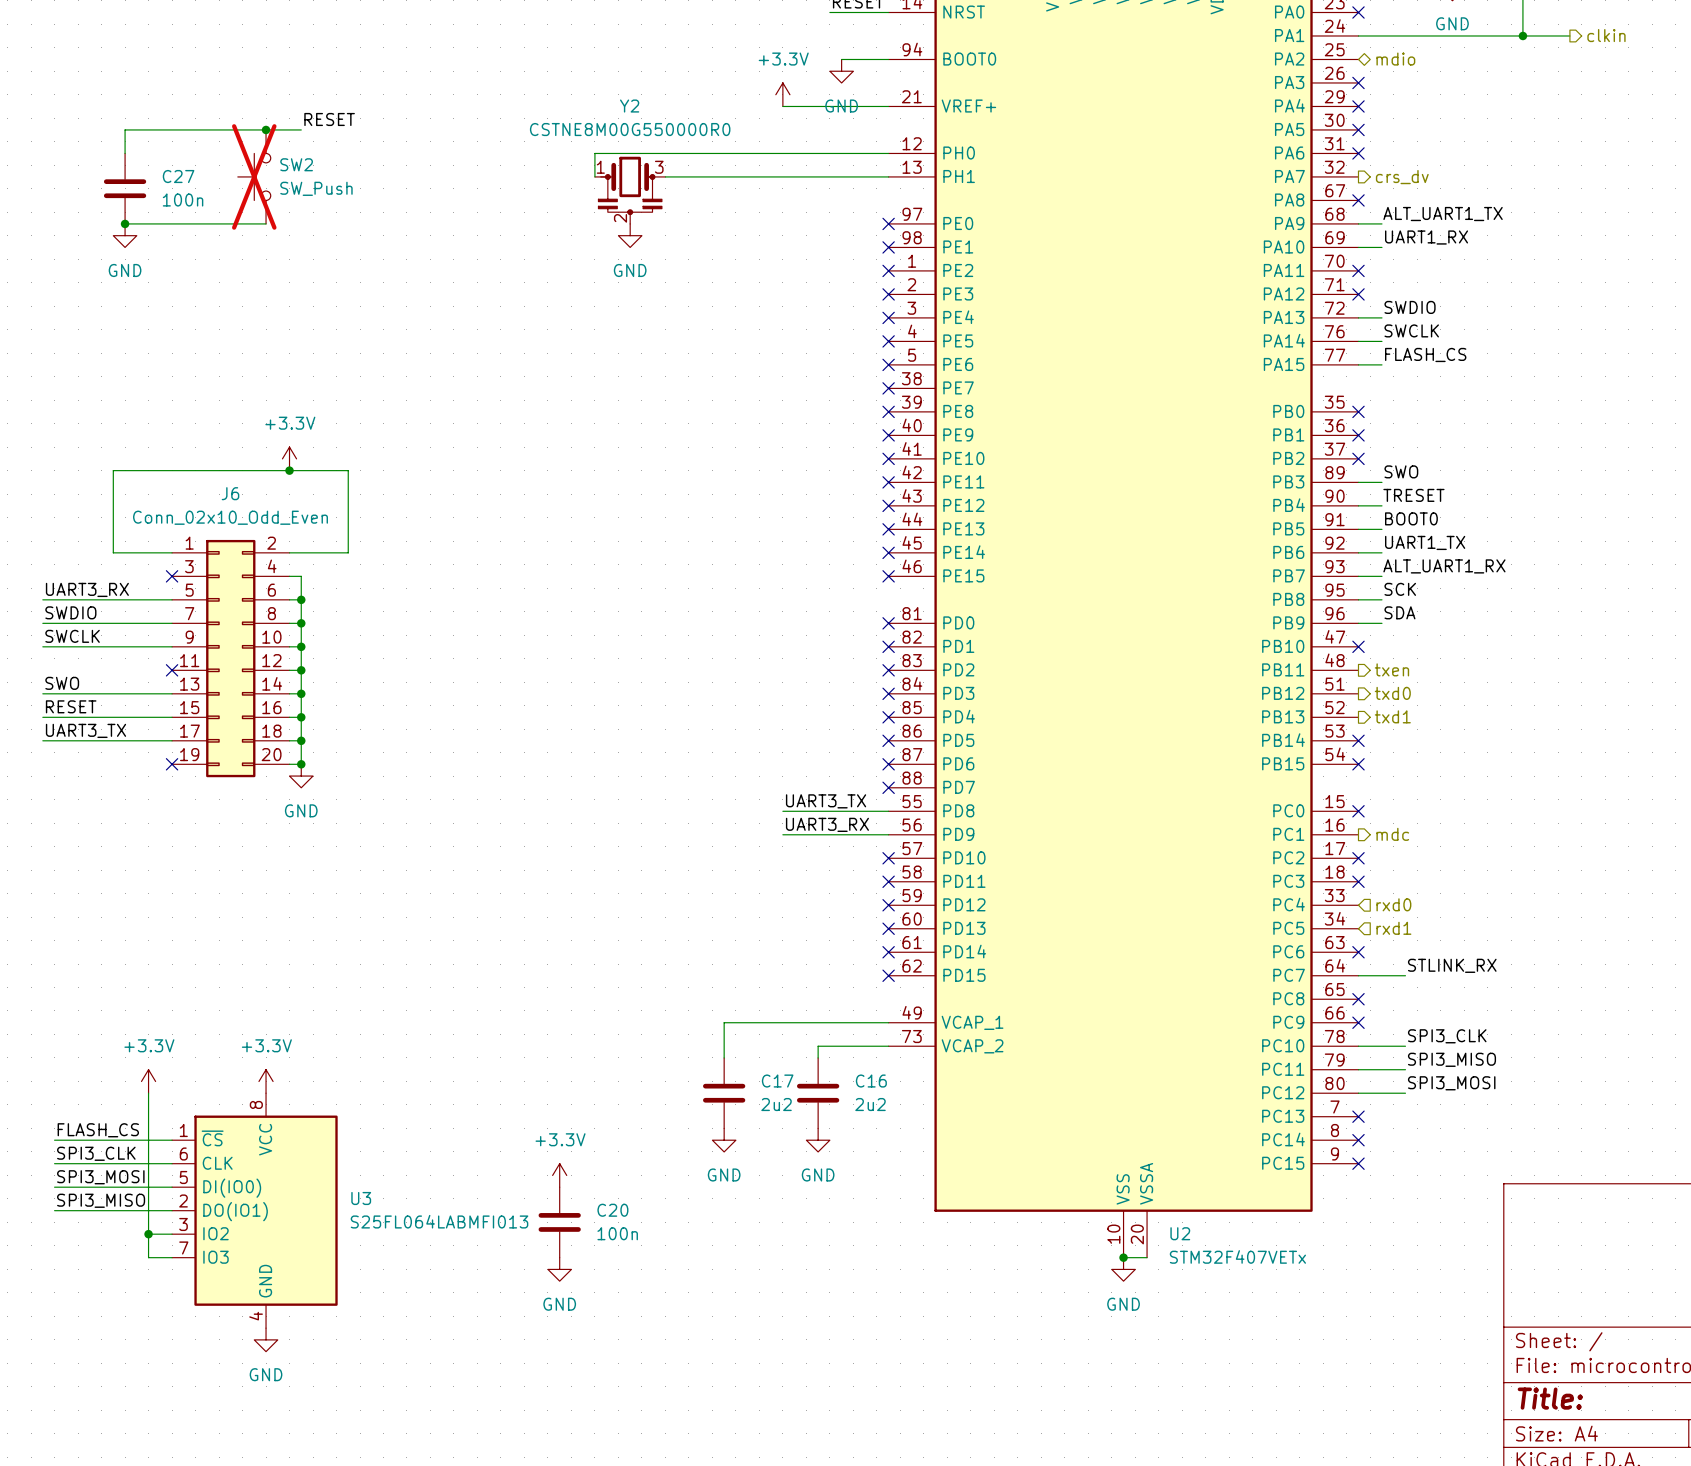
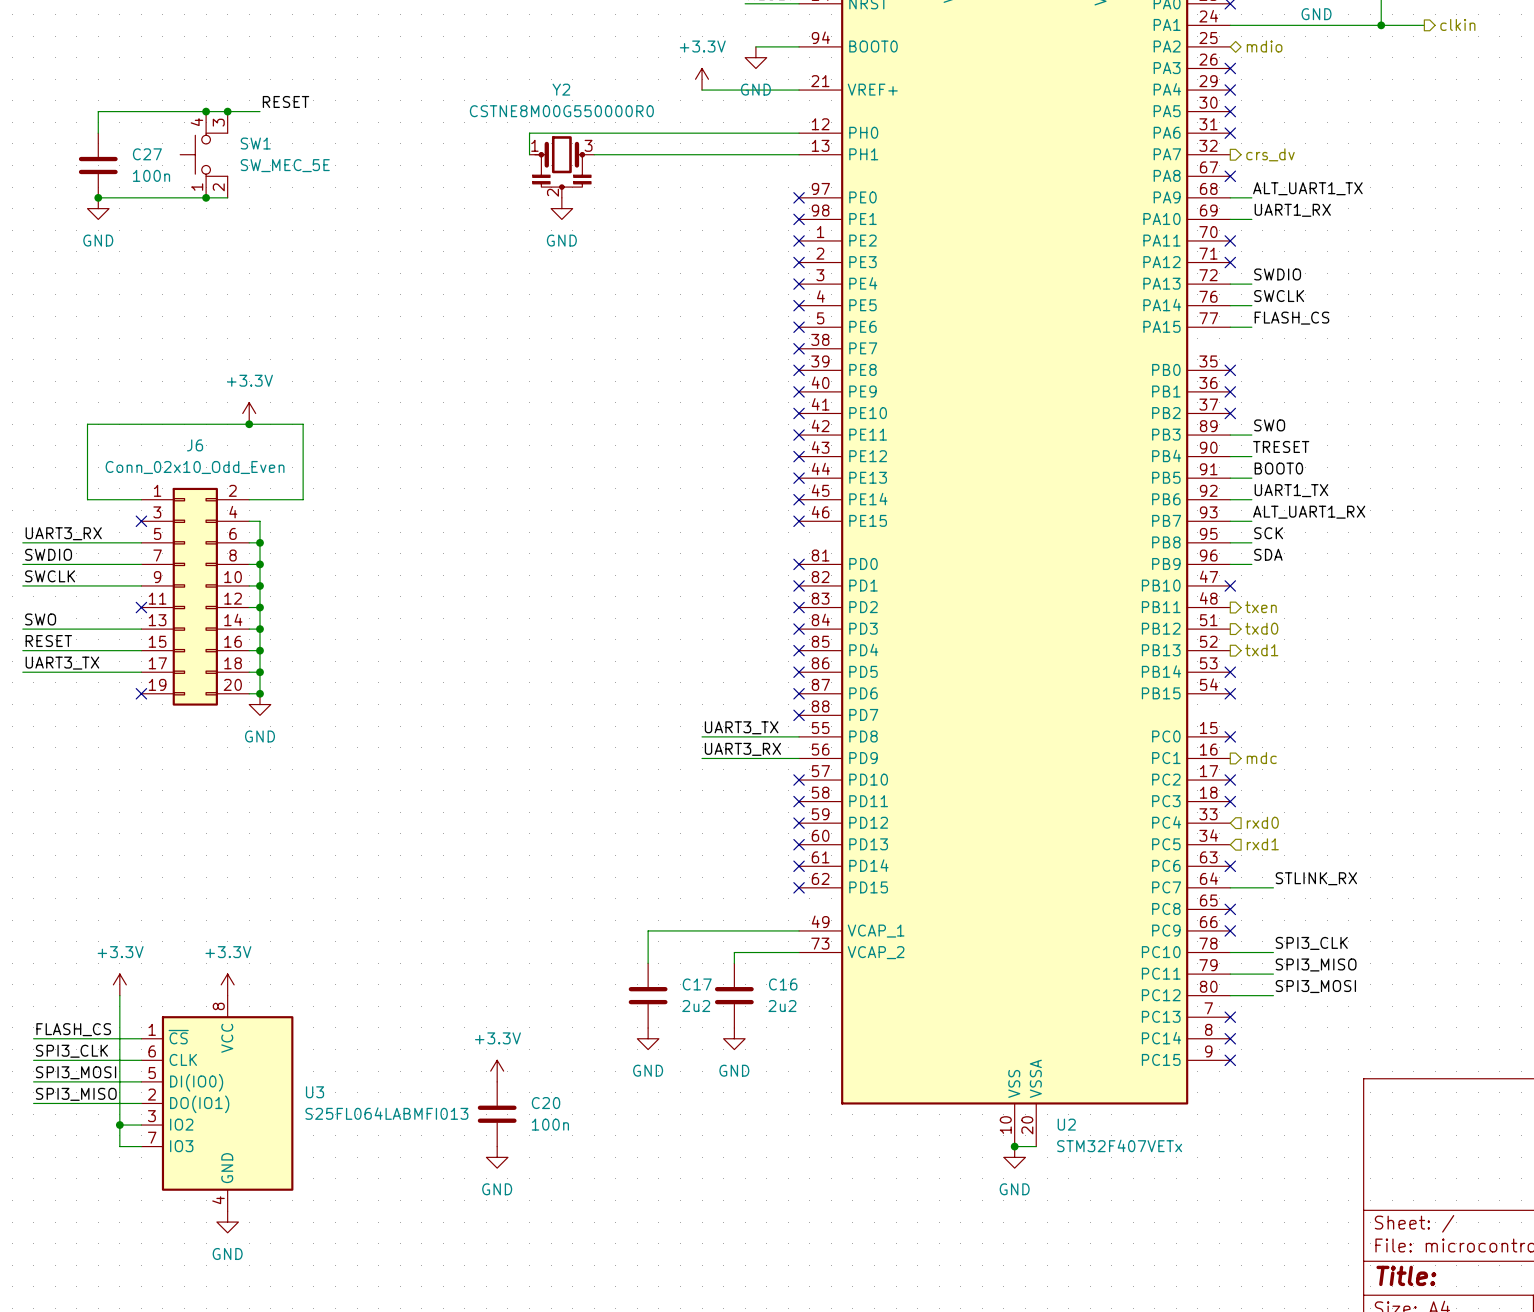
junction: none -> (206, 111)
SW1: none -> SW_MEC_5E (203, 154)
SW2: SW_Push (254, 176) -> none
junction: none -> (206, 197)

